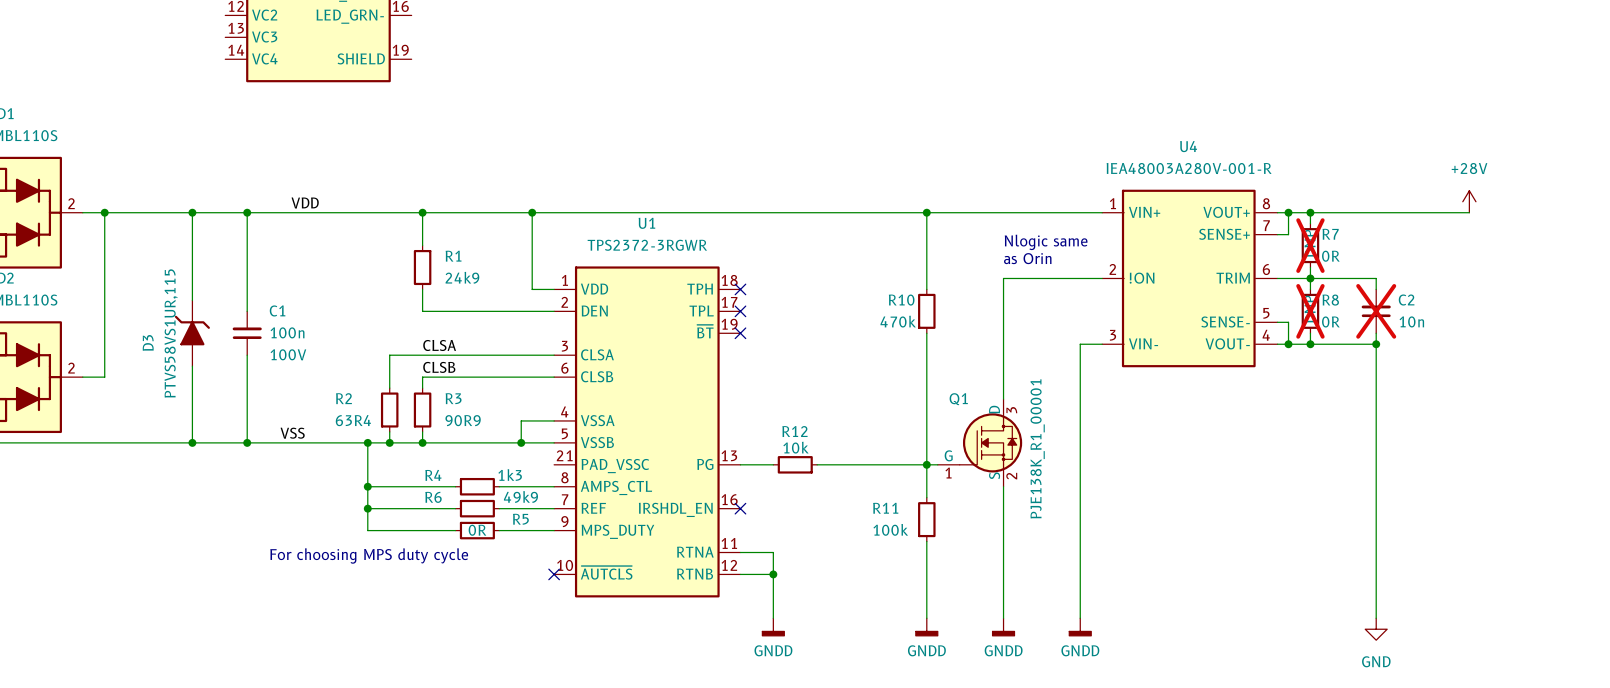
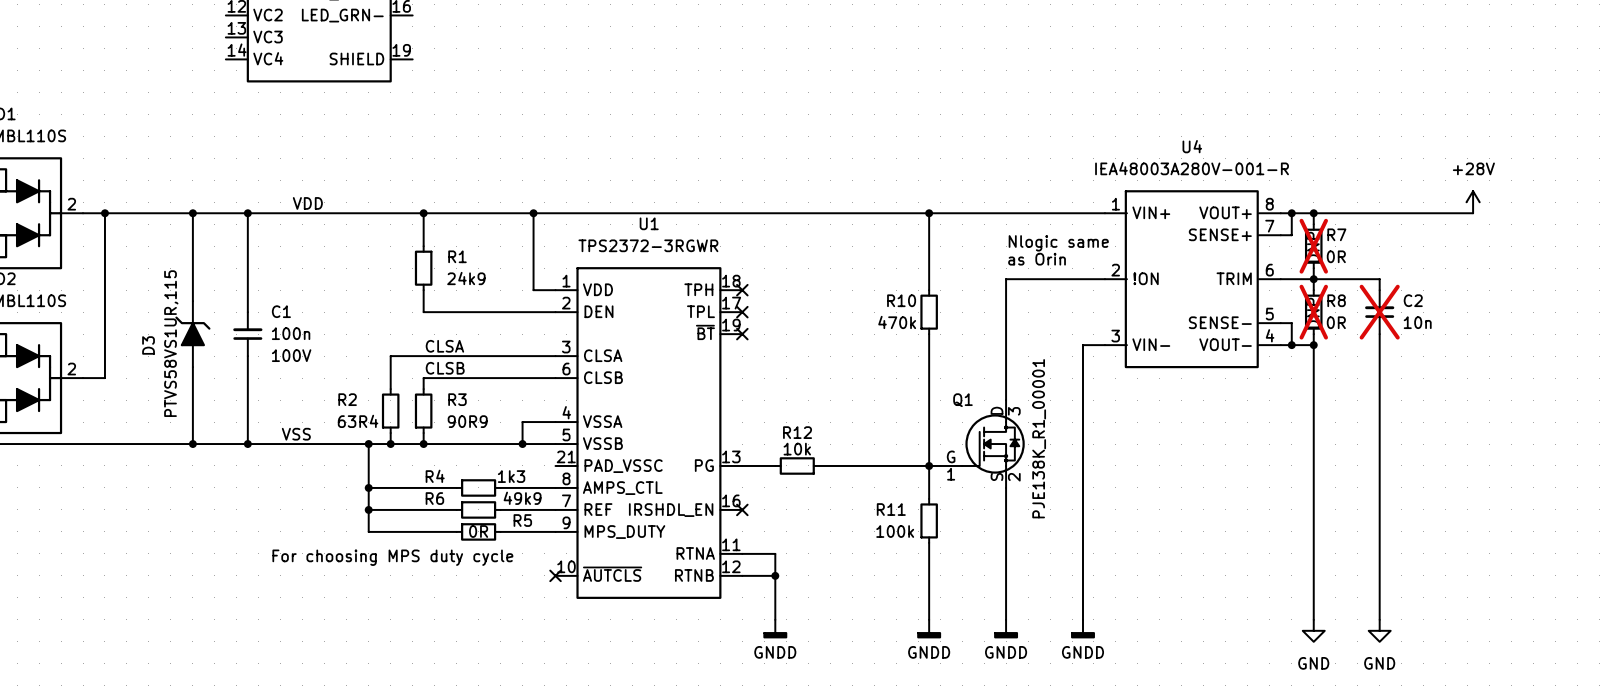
wire: (1310, 344) (1376, 344) -> (1313, 345) (1313, 619)
junction: (1376, 344) -> none
power symbol: none -> GND (1313, 630)

